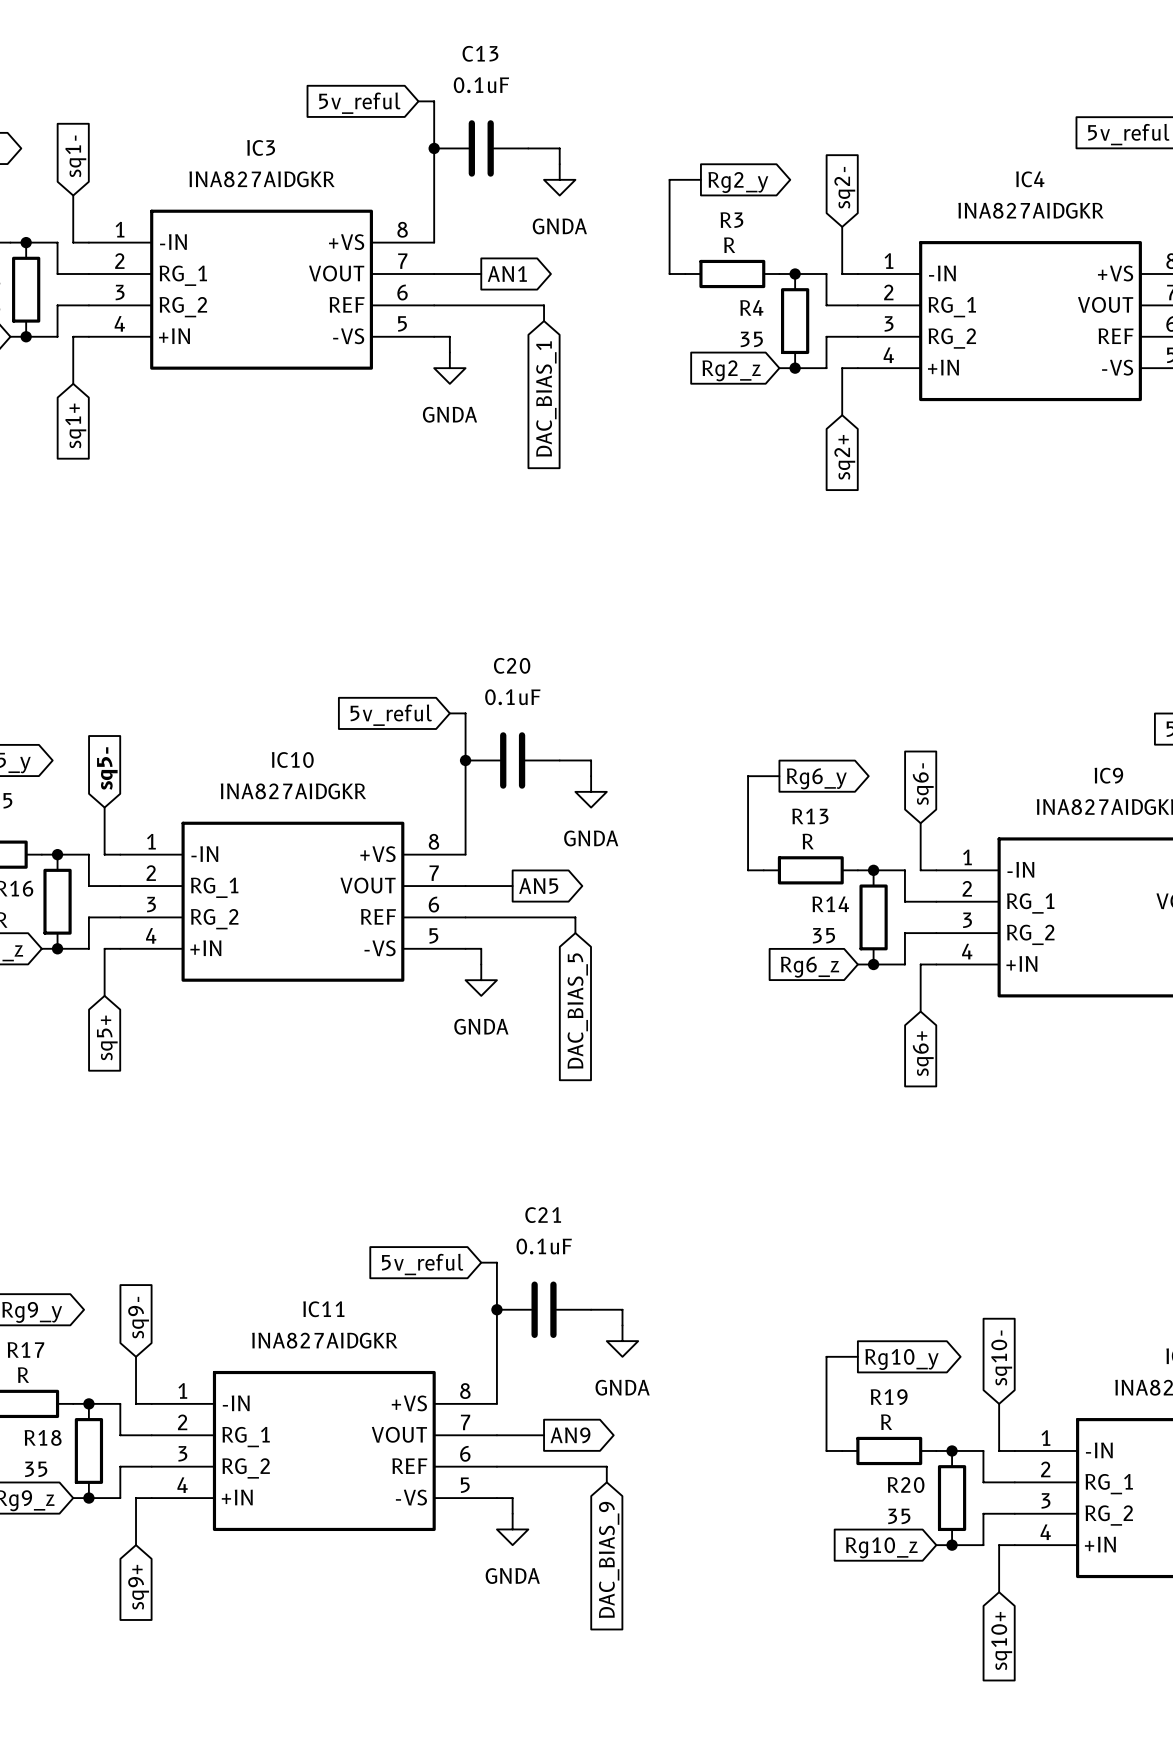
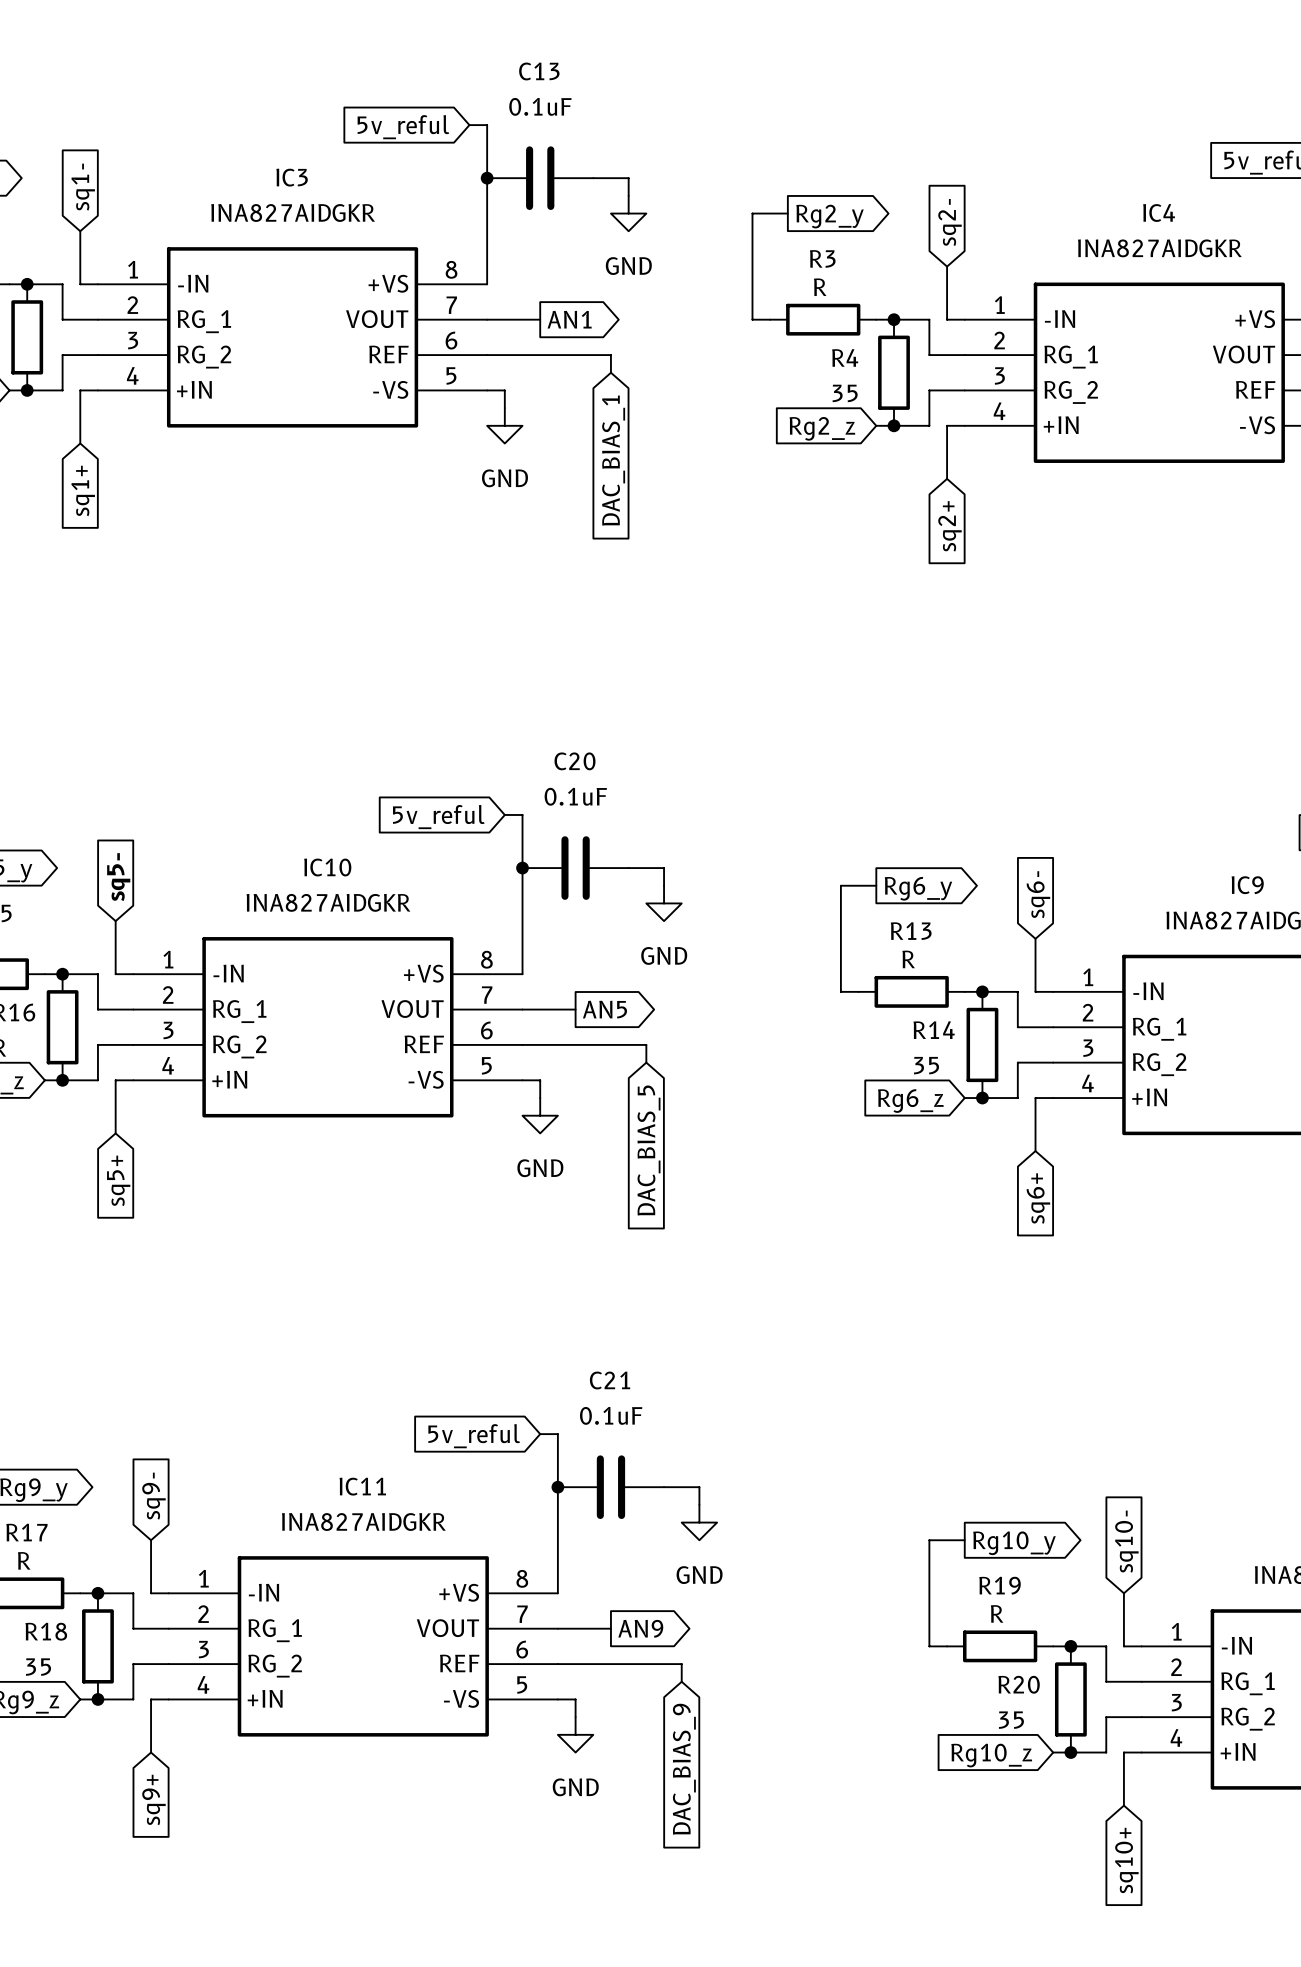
power symbol: GNDA (559, 179) -> GND (628, 213)
power symbol: GNDA (449, 368) -> GND (504, 425)
power symbol: GNDA (591, 791) -> GND (664, 903)
power symbol: GNDA (481, 980) -> GND (540, 1115)
power symbol: GNDA (622, 1341) -> GND (699, 1522)
power symbol: GNDA (512, 1529) -> GND (575, 1734)

